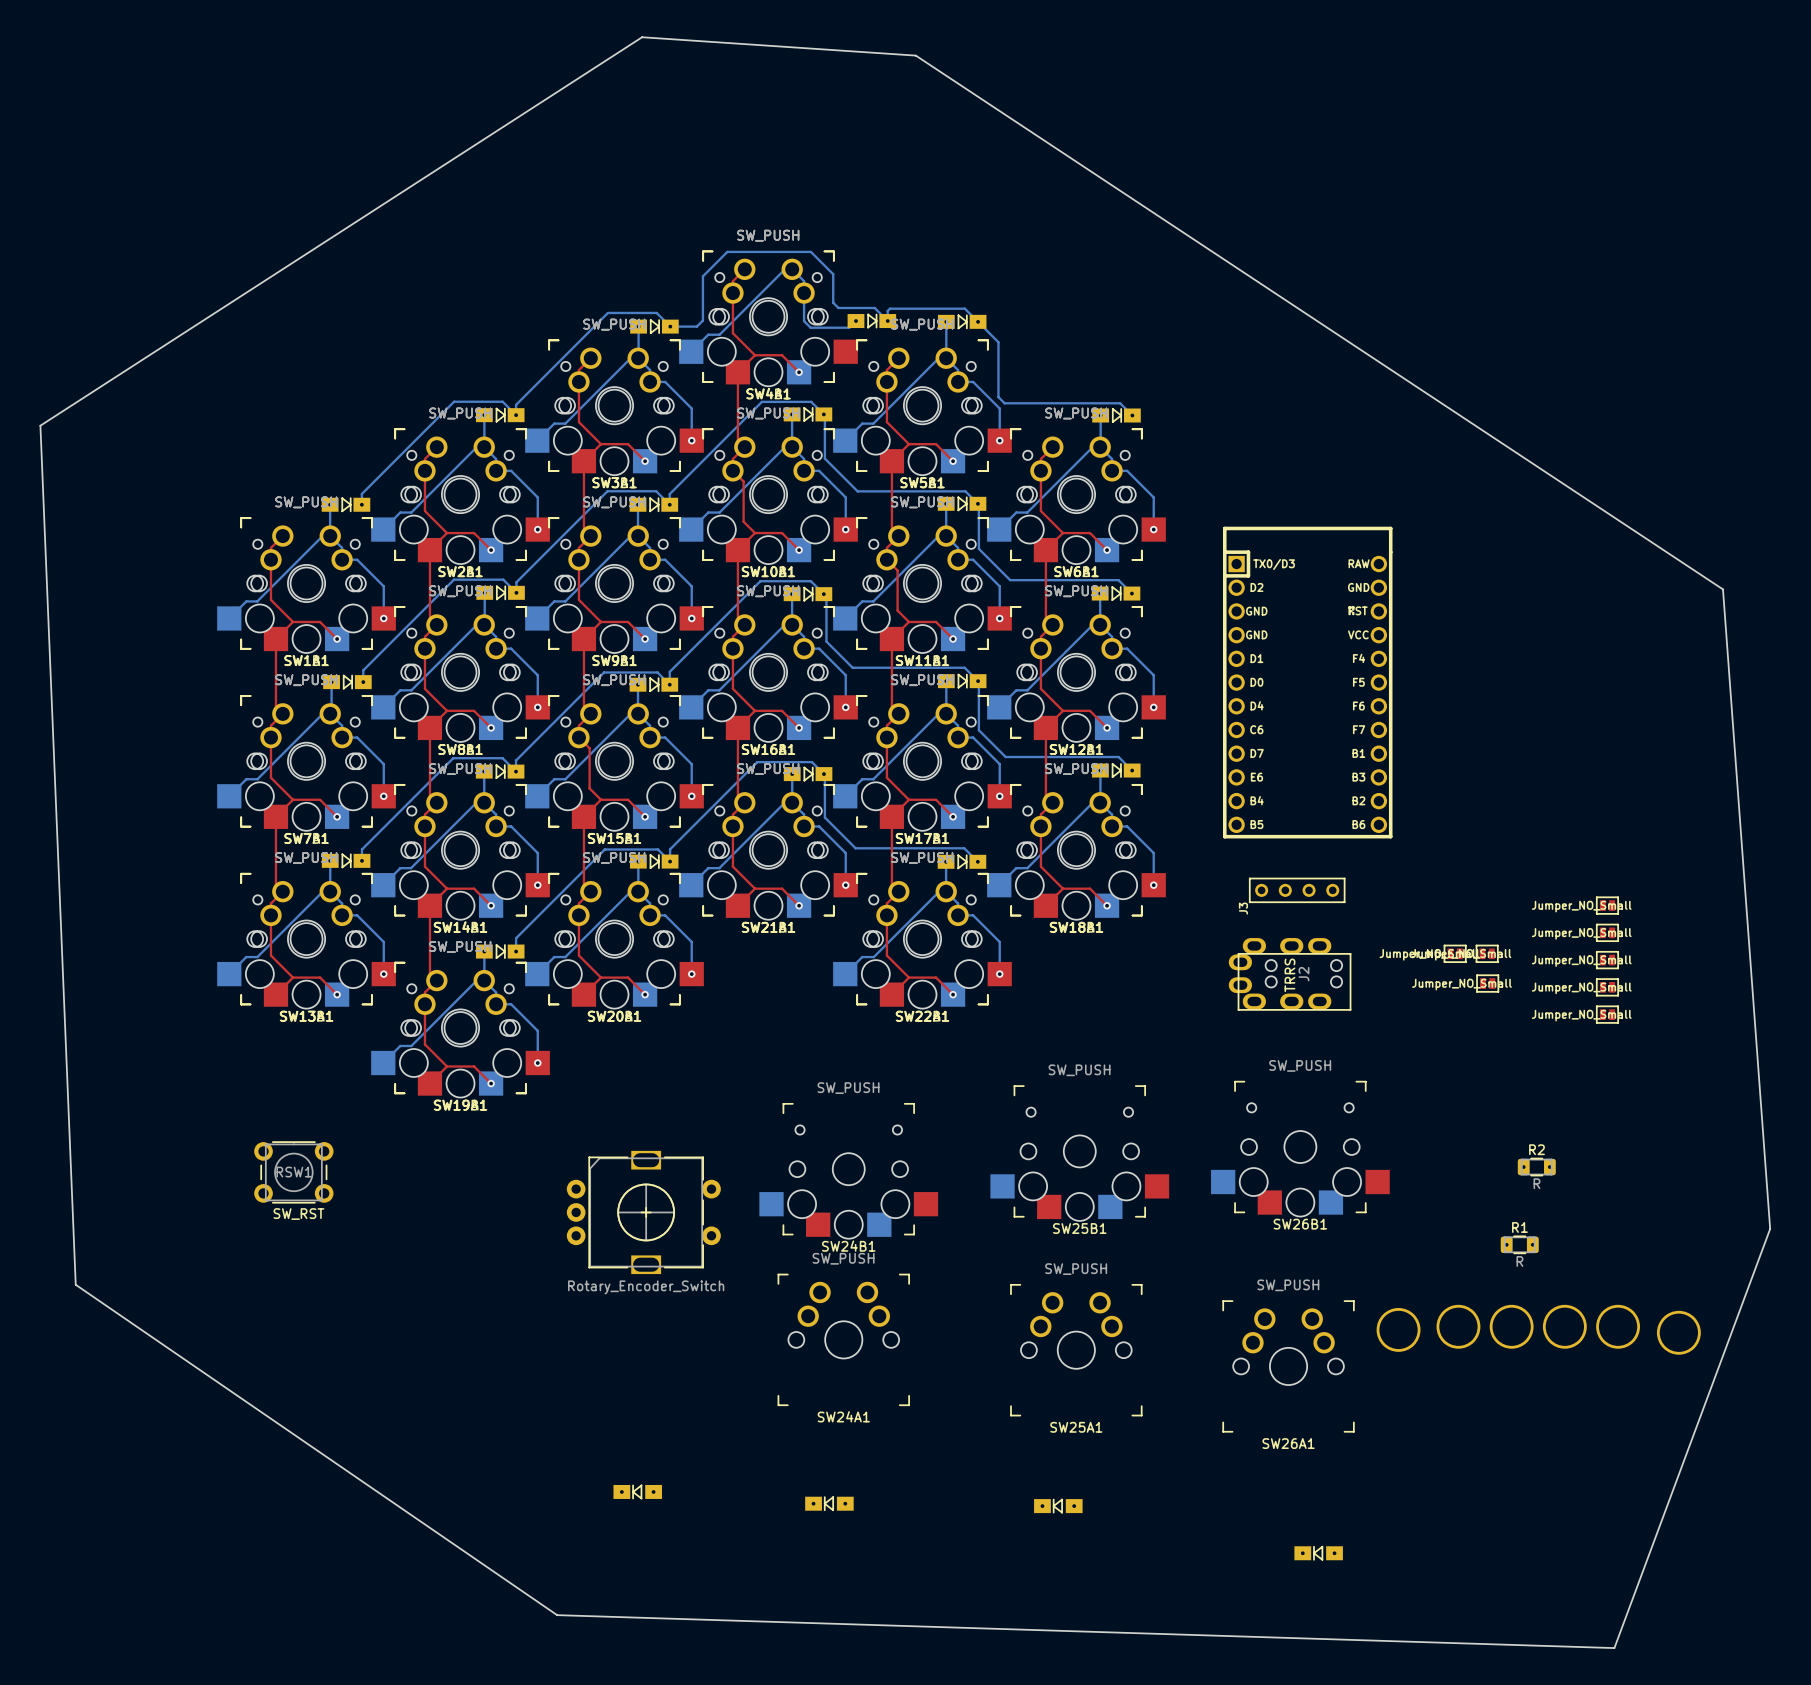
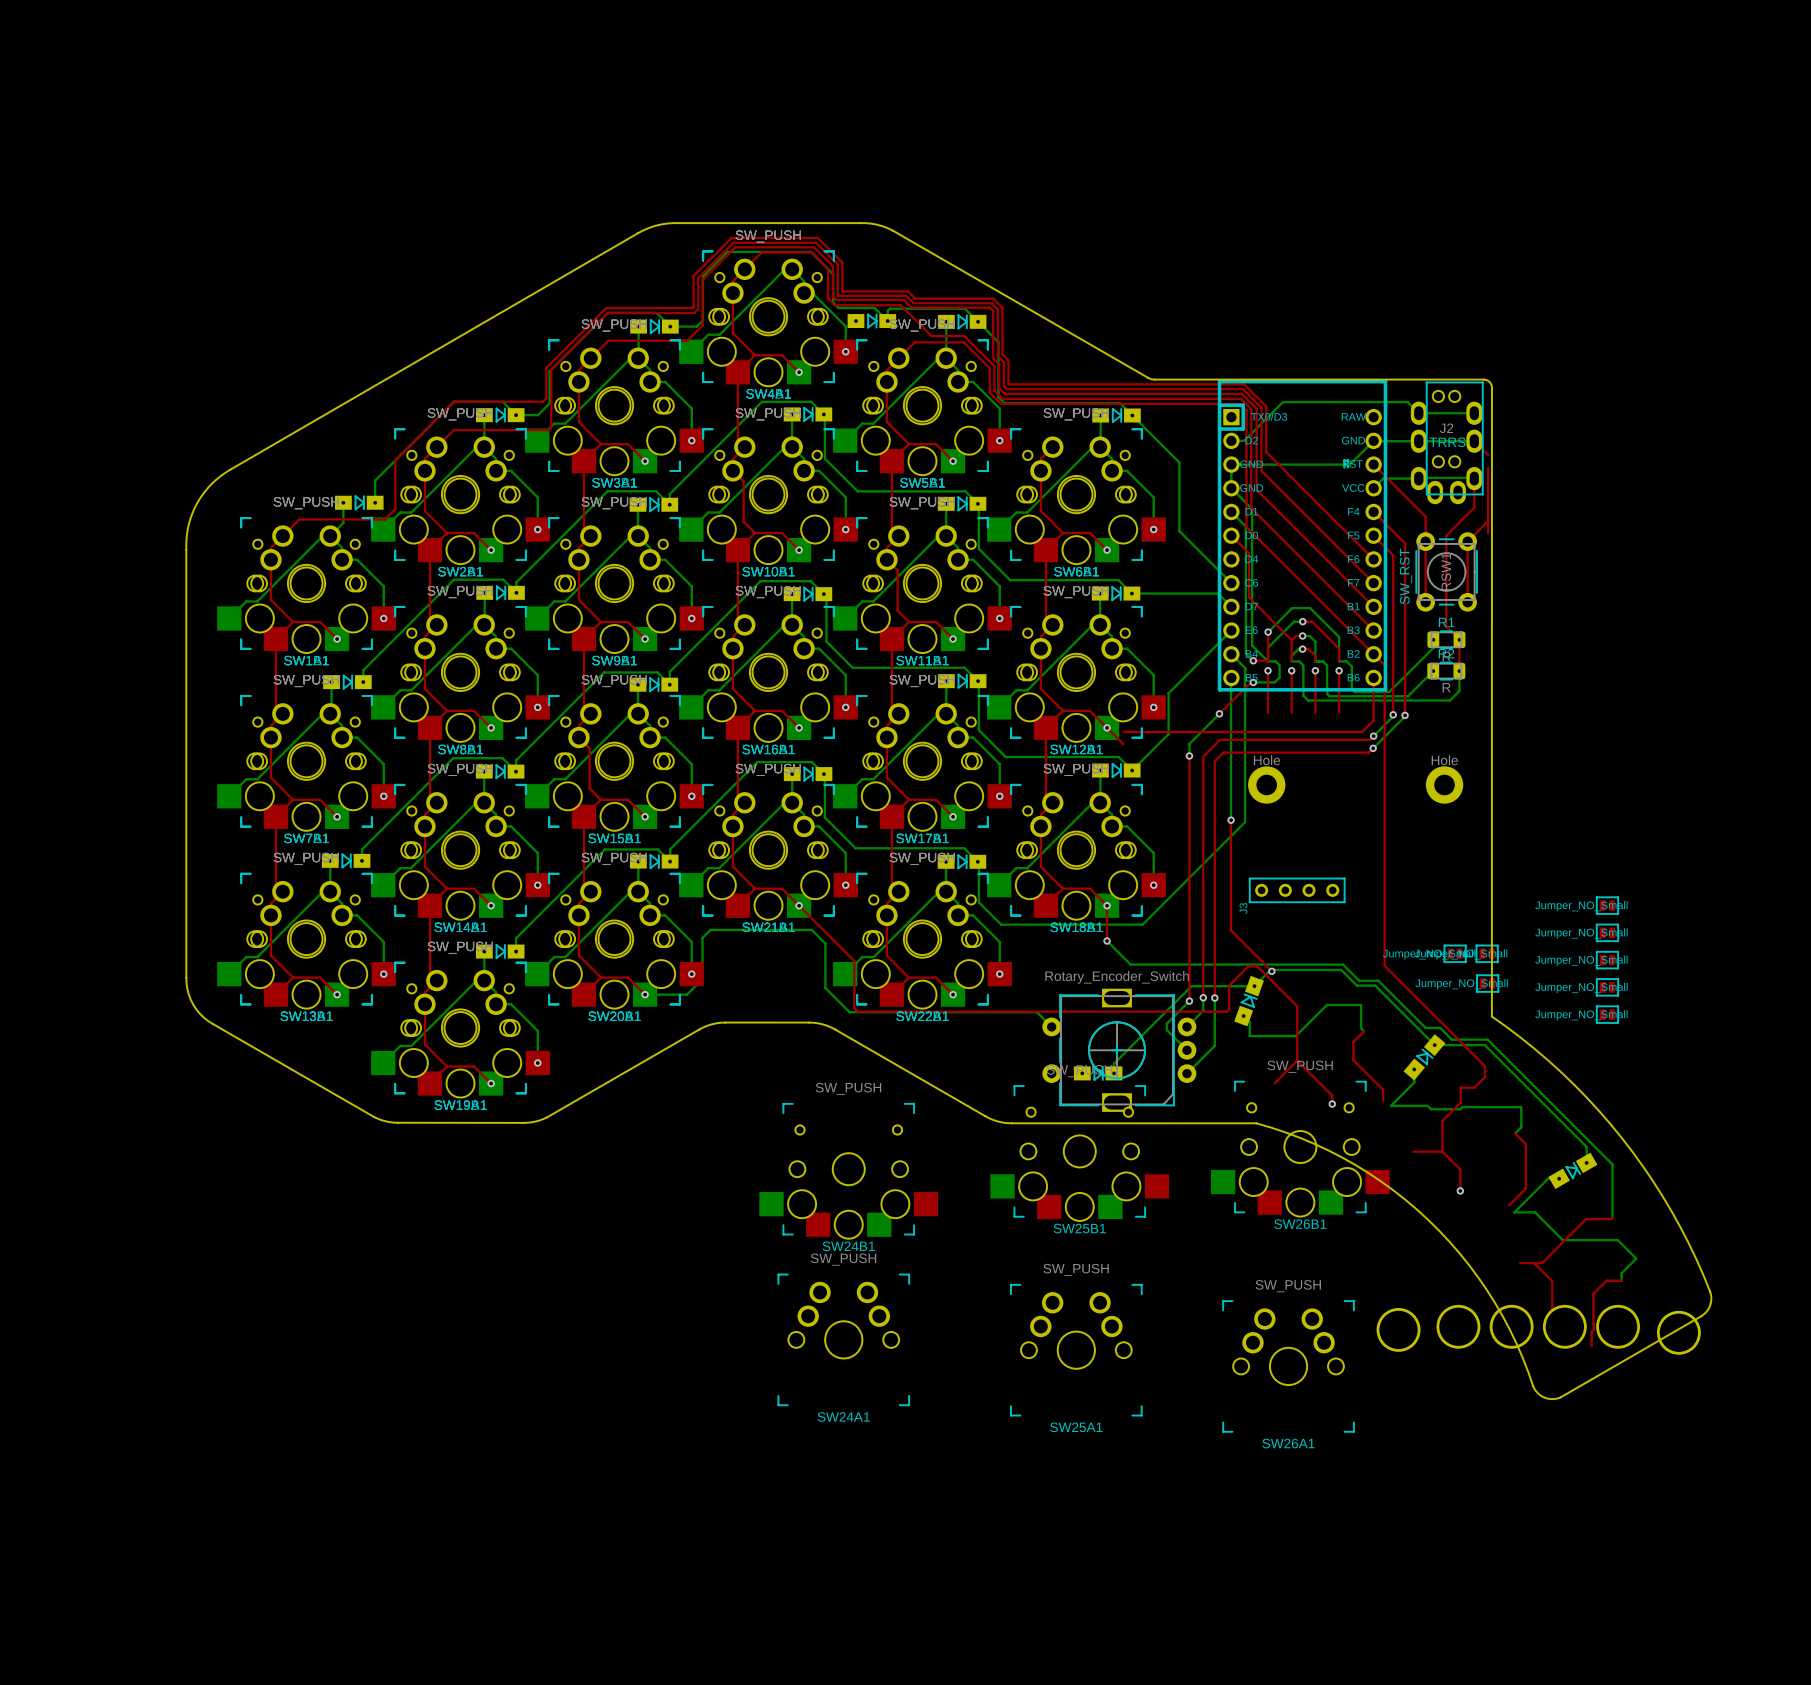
board edge: (642, 37) (40, 425) (75, 1284) (557, 1615) (1614, 1648) (1770, 1228) (1722, 589) (915, 55) (642, 37) -> (674, 223) (655, 225) (637, 233) (230, 469) (208, 486) (197, 503) (189, 522) (186, 542) (186, 977) (190, 999) (199, 1013) (212, 1023) (374, 1117) (393, 1122) (535, 1121) (547, 1117) (707, 1025) (725, 1022) (809, 1022) (822, 1024) (835, 1029) (985, 1116) (998, 1121) (1011, 1123) (1256, 1123) (1299, 1137) (1341, 1157) (1380, 1181) (1428, 1219) (1459, 1253) (1486, 1290) (1510, 1329) (1534, 1388) (1540, 1395) (1549, 1398) (1560, 1397) (1704, 1313) (1710, 1305) (1711, 1298) (1703, 1275) (1671, 1211) (1642, 1166) (1610, 1123) (1574, 1084) (1534, 1048) (1491, 1016) (1491, 387) (1489, 382) (1483, 379) (1152, 379) (882, 226) (865, 223) (674, 223)
top track: none -> (744, 269) (761, 252) (811, 252) (828, 268) (828, 298) (834, 305) (900, 305) (931, 336) (964, 336) (994, 366) (994, 390) (1002, 398) (1240, 398) (1251, 409) (1251, 508) (1373, 630)
top track: none -> (842, 291) (842, 262) (817, 237) (731, 237) (693, 276) (692, 308) (606, 308) (546, 367) (546, 398) (542, 401) (454, 401) (395, 460) (395, 509) (384, 519) (299, 519) (282, 536)
top track: none -> (842, 291) (908, 291) (915, 298) (993, 298) (1002, 307) (1002, 354) (1008, 360) (1008, 384) (1244, 384) (1266, 406) (1266, 452) (1373, 559)
bottom track: (804, 293) (804, 321) (810, 327) (850, 326) -> (804, 293) (812, 293) (845, 326) (845, 351)
top track: none -> (606, 314) (551, 369) (551, 427) (548, 430) (453, 430) (436, 447)
top track: none -> (606, 314) (694, 312) (698, 309) (698, 278) (733, 242) (816, 242) (837, 264) (838, 295) (906, 295) (913, 303) (991, 303) (997, 309) (997, 356) (1003, 362) (1003, 386) (1006, 389) (1242, 389) (1261, 407) (1261, 470) (1373, 583)
via: none -> (845, 351)
top track: none -> (590, 358) (608, 340) (687, 340) (702, 325) (702, 280) (735, 247) (814, 247) (832, 266) (832, 296) (836, 300) (903, 300) (911, 307) (989, 307) (993, 311) (993, 358) (999, 364) (999, 388) (1004, 393) (1241, 393) (1256, 408) (1256, 489) (1373, 606)
top track: none -> (898, 358) (914, 342) (963, 342) (989, 368) (989, 392) (1000, 403) (1239, 403) (1246, 410) (1246, 527) (1384, 665) (1384, 965) (1484, 1066) (1484, 1077) (1474, 1087) (1460, 1087) (1460, 1102) (1442, 1120) (1442, 1151)
bottom track: (549, 371) (516, 404) (516, 415) -> (549, 371) (549, 403) (538, 415) (516, 415)
bottom track: none -> (1132, 415) (1179, 462) (1179, 531) (1231, 583)
bottom track: none -> (1472, 415) (1469, 413) (1418, 413) (1407, 402) (1282, 402) (1244, 440) (1231, 440)
bottom track: none -> (1474, 441) (1373, 440) (1349, 464) (1231, 464) (1231, 488) (1252, 509) (1252, 645) (1267, 661)
top track: none -> (1474, 441) (1488, 455)
top track: none -> (1373, 464) (1425, 516) (1425, 602)
top track: none -> (1488, 467) (1488, 533)
bottom track: none -> (1474, 478) (1383, 478) (1373, 488)
top track: none -> (1474, 478) (1474, 507) (1446, 535) (1446, 626) (1459, 639)
bottom track: (375, 480) (361, 493) (361, 504) -> (375, 480) (375, 502)
bottom track: (330, 504) (330, 528) (257, 601) -> (343, 502) (343, 522) (330, 536) (322, 536) (257, 601)
part position: (346, 504) -> (359, 502)
bottom track: none -> (1231, 511) (1245, 526) (1245, 653) (1253, 660)
top track: none -> (1373, 511) (1405, 543) (1405, 715)
top track: none -> (1488, 520) (1467, 541) (1467, 602)
top track: none -> (1231, 535) (1249, 553) (1249, 597) (1291, 640)
top track: none -> (1373, 535) (1393, 555) (1393, 714)
bottom track: none -> (1131, 593) (1218, 593) (1231, 606)
bottom track: none -> (1302, 621) (1294, 621) (1267, 647) (1267, 661)
top track: none -> (1302, 621) (1312, 621) (1339, 648) (1339, 661)
via: none -> (1302, 621)
bottom track: none -> (1231, 630) (1168, 693) (1168, 734) (1132, 770)
bottom track: none -> (1268, 632) (1292, 608) (1310, 608) (1339, 637) (1339, 661) (1346, 661) (1351, 666) (1351, 689) (1354, 692) (1389, 692) (1433, 647) (1433, 639)
top track: none -> (1268, 632) (1268, 661) (1253, 660)
via: none -> (1268, 632)
bottom track: none -> (1302, 635) (1309, 635) (1315, 641) (1315, 661) (1323, 661) (1327, 665) (1327, 693) (1329, 696) (1408, 696) (1433, 671)
top track: none -> (1302, 635) (1295, 635) (1291, 640)
via: none -> (1302, 635)
top track: none -> (1459, 639) (1459, 671)
top track: none -> (1291, 640) (1291, 661)
bottom track: none -> (1302, 649) (1298, 649) (1291, 655) (1291, 661) (1299, 661) (1303, 665) (1303, 695) (1308, 700) (1449, 700) (1459, 691) (1459, 671)
top track: none -> (1302, 649) (1308, 649) (1315, 655) (1315, 661)
via: none -> (1302, 649)
bottom track: none -> (1231, 654) (1245, 668) (1245, 822) (1142, 924) (1001, 924) (978, 902) (977, 861)
via: none -> (1253, 660)
bottom track: none -> (1267, 661) (1275, 661) (1279, 665) (1279, 677) (1274, 682) (1253, 682)
top track: none -> (1267, 670) (1267, 712)
via: none -> (1267, 670)
top track: none -> (1291, 670) (1291, 712)
via: none -> (1291, 670)
top track: none -> (1315, 670) (1315, 712)
via: none -> (1315, 670)
top track: none -> (1339, 670) (1339, 712)
via: none -> (1339, 670)
bottom track: none -> (1231, 677) (1231, 820)
top track: none -> (1373, 677) (1373, 720) (1362, 732) (1123, 732)
top track: none -> (1253, 682) (1250, 682) (1219, 713)
via: none -> (1253, 682)
part position: (1307, 682) -> (1302, 535)
bottom track: none -> (1219, 713) (1189, 743) (1189, 755)
via: none -> (1219, 713)
bottom track: none -> (1393, 714) (1373, 736)
via: none -> (1393, 714)
bottom track: none -> (1405, 715) (1373, 748)
via: none -> (1405, 715)
top track: none -> (1107, 727) (1123, 744)
top track: none -> (1373, 736) (1369, 739) (1220, 739) (1203, 756) (1203, 997)
via: none -> (1373, 736)
top track: none -> (1373, 748) (1368, 752) (1223, 752) (1214, 761) (1214, 998)
via: none -> (1373, 748)
top track: none -> (1189, 755) (1189, 1001)
via: none -> (1189, 755)
part: none -> Hole (1266, 784)
part: none -> Hole (1444, 784)
top track: none -> (1230, 820) (1230, 930) (1271, 971)
via: none -> (1231, 820)
top track: none -> (799, 905) (854, 961) (854, 1008) (857, 1011) (1226, 1011) (1229, 1009) (1229, 985) (1248, 966) (1257, 966) (1297, 1006) (1297, 1060)
top track: none -> (1107, 905) (1107, 941)
bottom track: none -> (1107, 940) (1130, 964) (1343, 964) (1359, 980) (1378, 980) (1425, 1027) (1440, 1027) (1451, 1039) (1487, 1039) (1612, 1164) (1612, 1217)
via: none -> (1107, 940)
bottom track: none -> (1270, 969) (1254, 986) (1191, 986) (1114, 1063) (1114, 1073)
bottom track: none -> (1270, 969) (1341, 969) (1356, 985) (1375, 985) (1434, 1045) (1484, 1045) (1586, 1146) (1586, 1162)
via: none -> (1271, 971)
J2 rotation: 0° (1289, 974) -> 90° counterclockwise (1447, 442)
J2 position: (1289, 974) -> (1447, 442)
bottom track: none -> (645, 994) (687, 994) (702, 979) (702, 938) (710, 929) (811, 929) (825, 943) (825, 987) (849, 1012) (1036, 1012) (1051, 1026)
bottom track: none -> (1203, 997) (1203, 1010) (1187, 1026)
via: none -> (1203, 997)
bottom track: none -> (1214, 998) (1214, 1045) (1187, 1073)
via: none -> (1214, 998)
bottom track: none -> (1189, 1001) (1166, 1023) (1166, 1030) (1187, 1050)
via: none -> (1189, 1001)
part: none -> (1249, 1001)
bottom track: none -> (1243, 1016) (1249, 1022) (1249, 1036) (1295, 1036) (1326, 1004) (1361, 1004) (1361, 1028) (1364, 1031)
top track: none -> (1364, 1031) (1353, 1041) (1353, 1060) (1383, 1089) (1383, 1100)
part: none -> Rotary_Encoder_Switch (1119, 1050)
part: none -> (1424, 1057)
top track: none -> (1297, 1060) (1274, 1083)
top track: none -> (1297, 1060) (1332, 1095) (1332, 1104)
bottom track: none -> (1414, 1069) (1414, 1082) (1390, 1105) (1427, 1105) (1431, 1109) (1520, 1107) (1521, 1127) (1515, 1133)
part: none -> (1098, 1073)
via: none -> (1332, 1104)
top track: none -> (1515, 1133) (1525, 1144) (1525, 1188) (1509, 1205)
top track: none -> (1413, 1151) (1442, 1151)
top track: none -> (1442, 1151) (1460, 1169) (1460, 1190)
R2 position: (1536, 1167) -> (1446, 671)
part: none -> (1572, 1170)
RSW1 rotation: 0° (293, 1172) -> 90° clockwise (1446, 571)
RSW1 position: (293, 1172) -> (1446, 571)
bottom track: none -> (1559, 1178) (1548, 1178) (1514, 1212) (1535, 1212) (1562, 1240) (1617, 1240) (1636, 1258) (1621, 1273) (1621, 1280)
via: none -> (1460, 1190)
part: Rotary_Encoder_Switch (643, 1212) -> none
top track: none -> (1612, 1217) (1586, 1219) (1542, 1263) (1519, 1263)
R1 position: (1519, 1244) -> (1446, 639)
top track: none -> (1533, 1263) (1552, 1281) (1552, 1314) (1550, 1316)
top track: none -> (1621, 1280) (1606, 1280) (1593, 1293) (1593, 1329) (1591, 1331) (1591, 1346)
part: (637, 1491) -> none
part: (829, 1503) -> none
part: (1058, 1506) -> none
part: (1318, 1553) -> none

